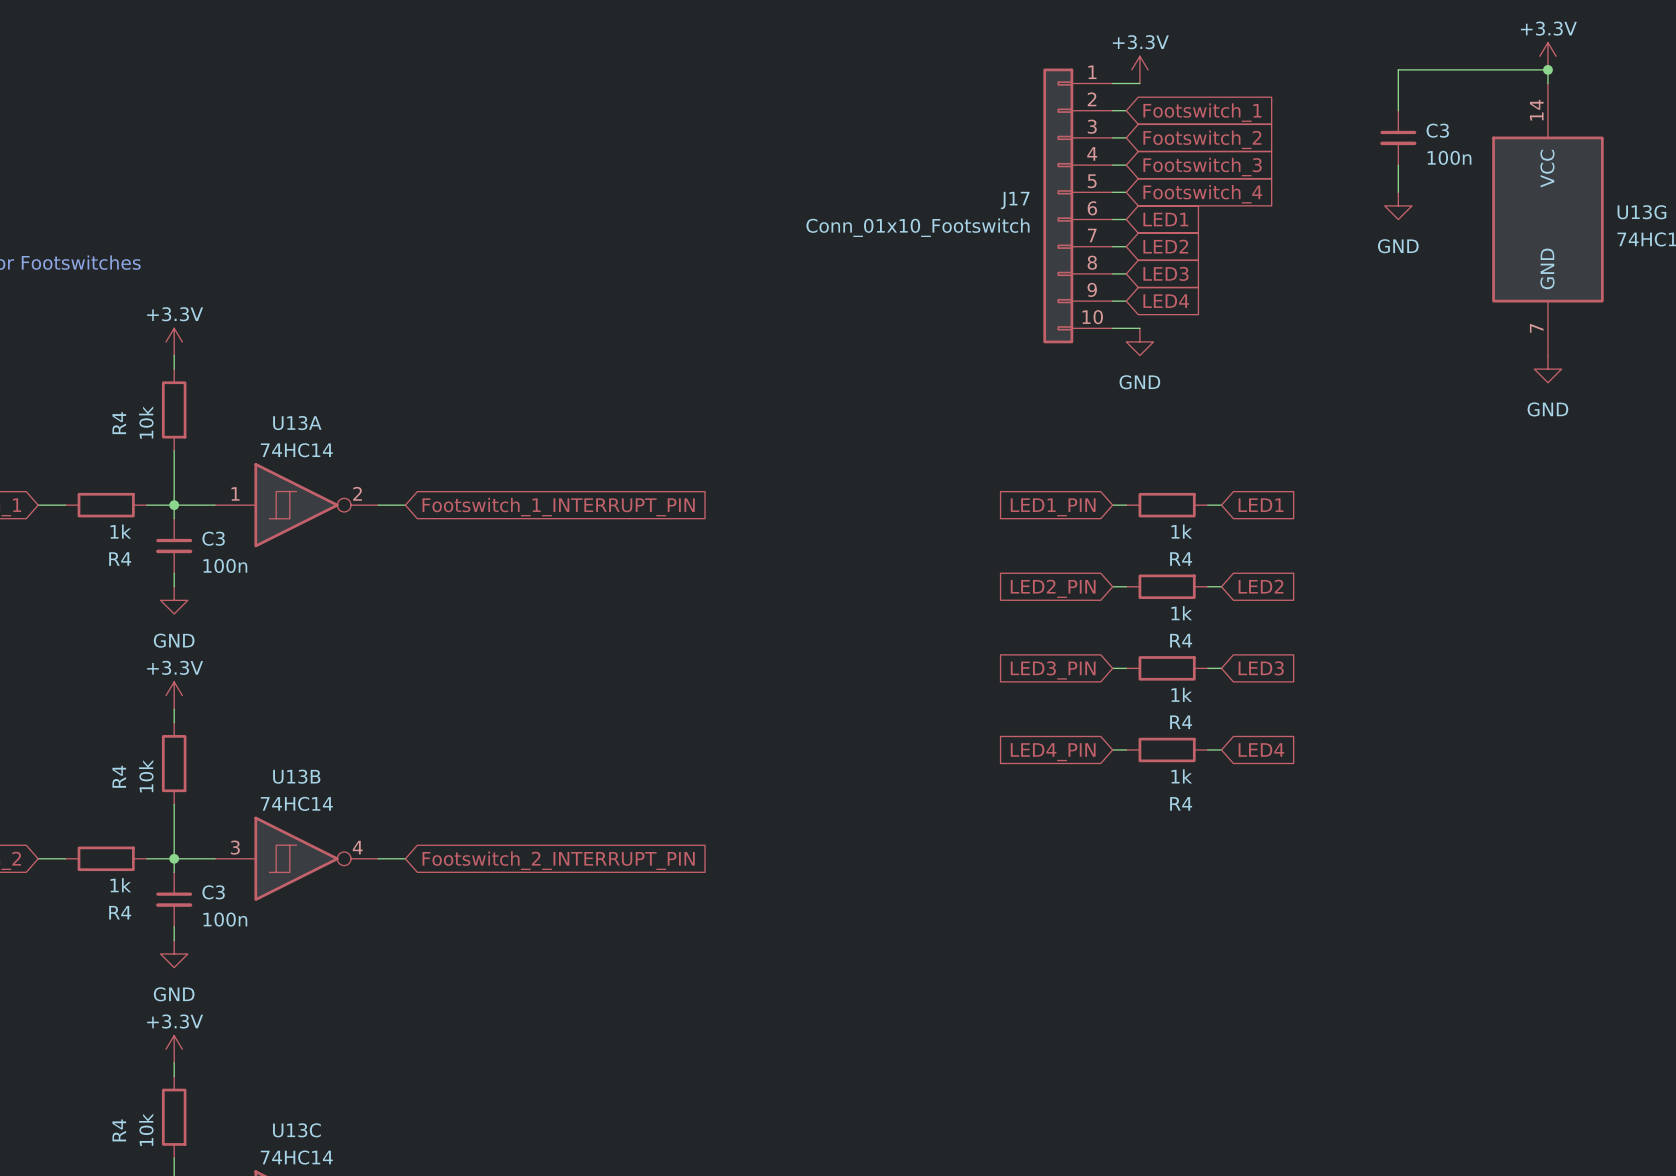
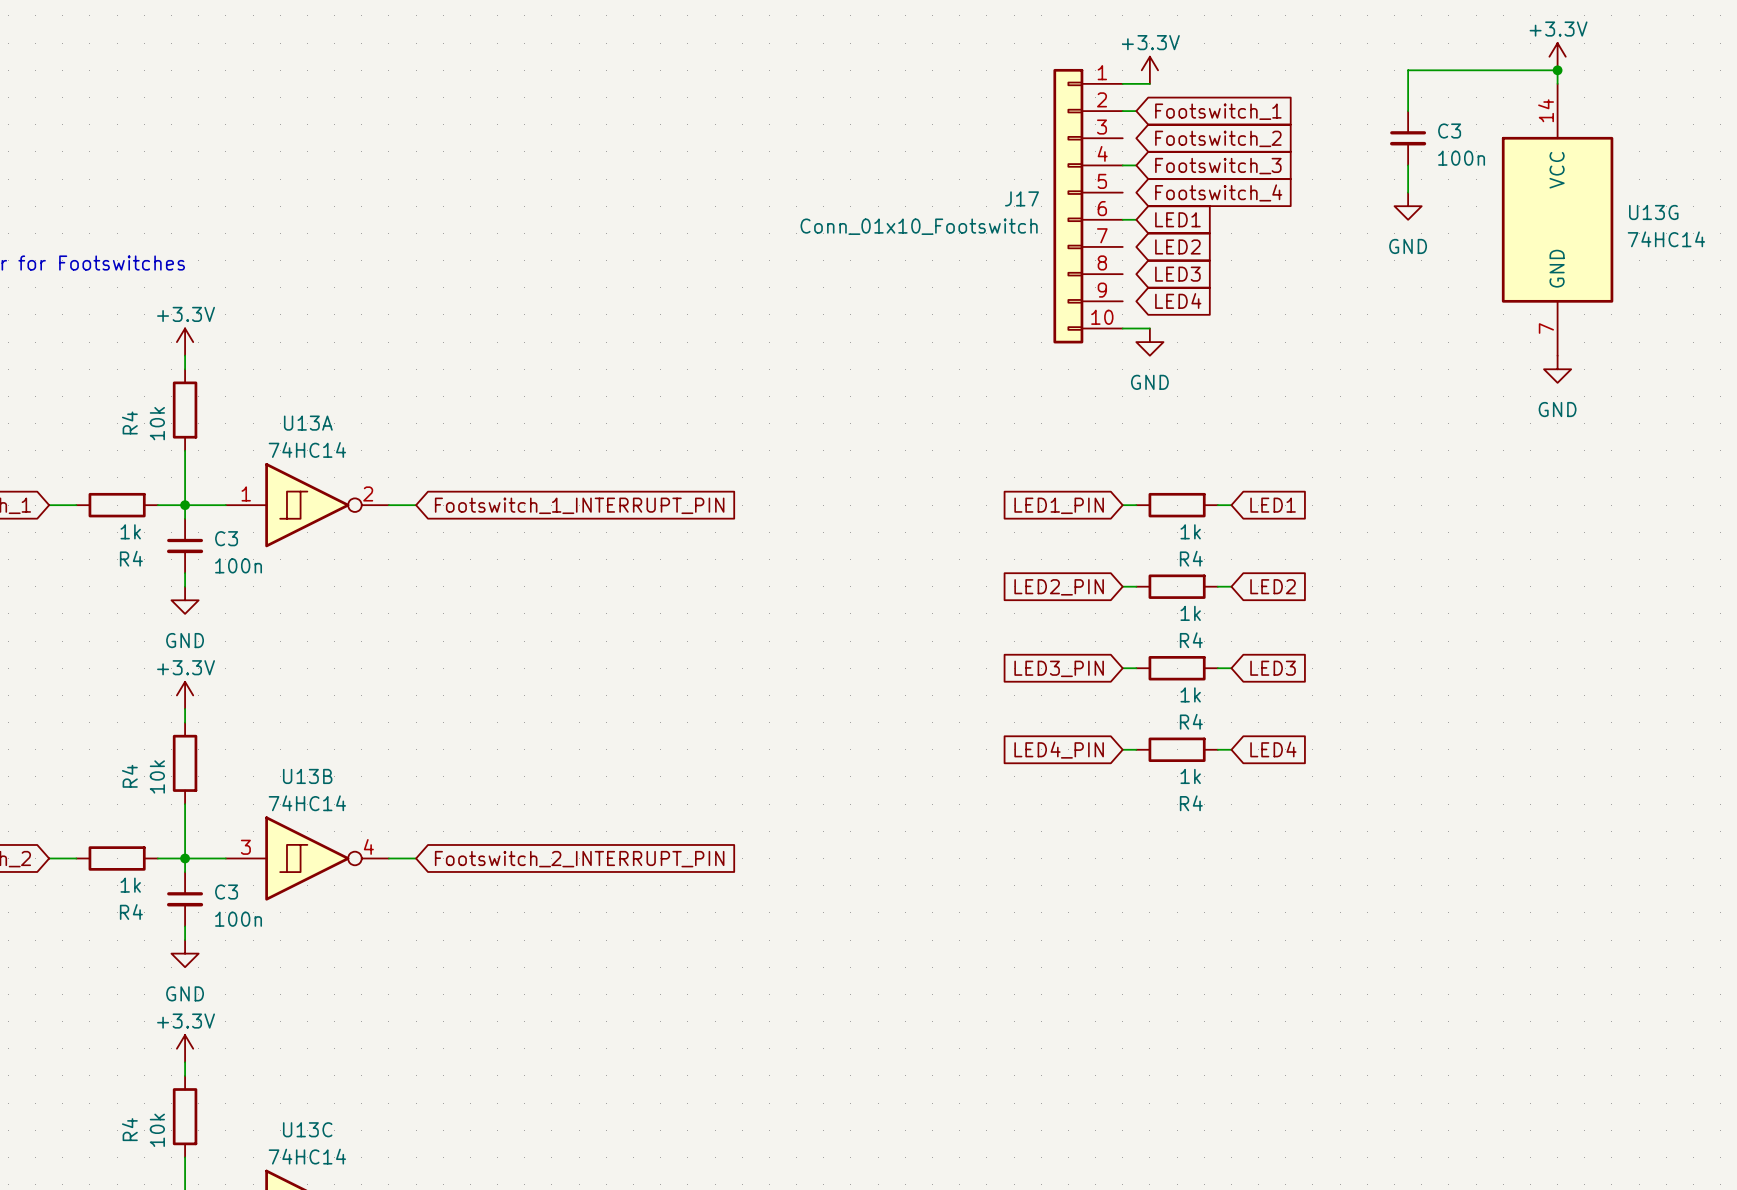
wire: (1112, 137) (1126, 137) -> none
wire: (1112, 192) (1126, 192) -> none
wire: (1112, 246) (1126, 246) -> none
wire: (1112, 273) (1126, 273) -> none
wire: (1112, 301) (1126, 301) -> none

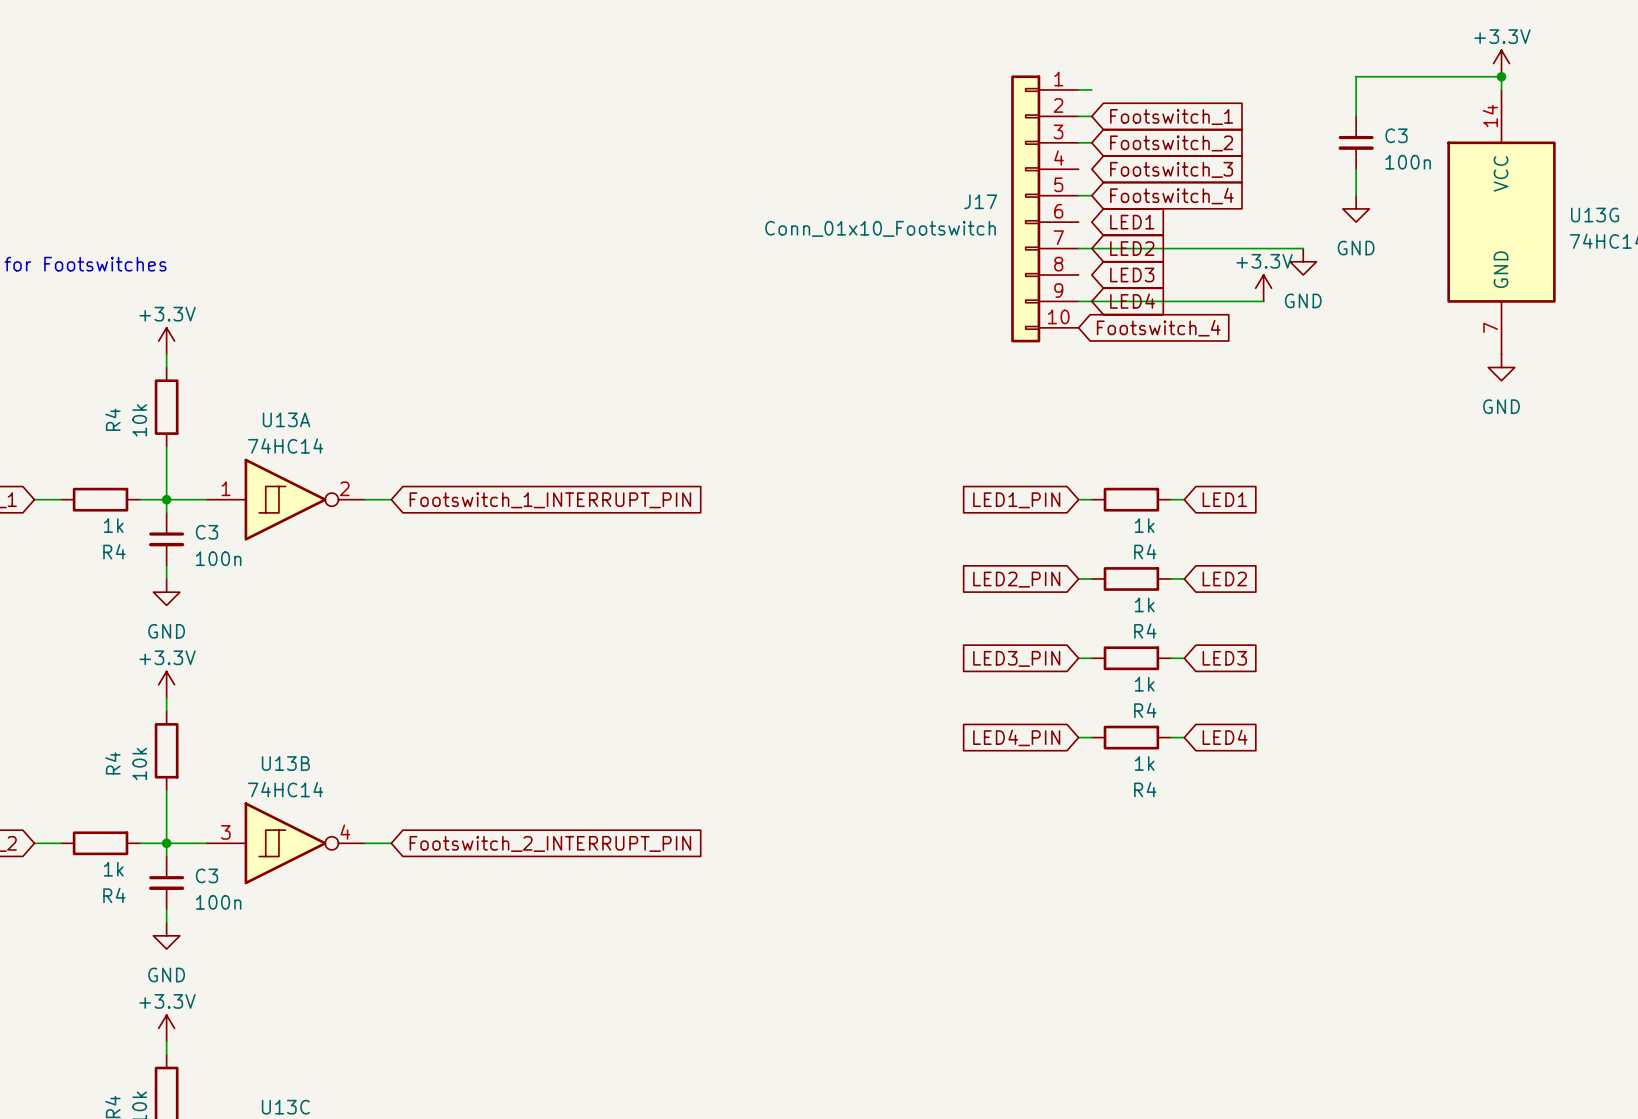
power symbol: +3.3V (1149, 70) -> none
wire: (1136, 83) (1149, 83) -> none
wire: (1122, 165) (1136, 165) -> (1078, 142) (1091, 142)
wire: (1122, 219) (1136, 219) -> (1078, 195) (1091, 195)
wire: none -> (1078, 248) (1303, 248)
power symbol: none -> +3.3V (1263, 288)
wire: none -> (1078, 301) (1263, 301)
wire: (1122, 328) (1149, 328) -> none
global label: none -> Footswitch_4 (1158, 328)
power symbol position: GND (1149, 342) -> GND (1303, 261)

